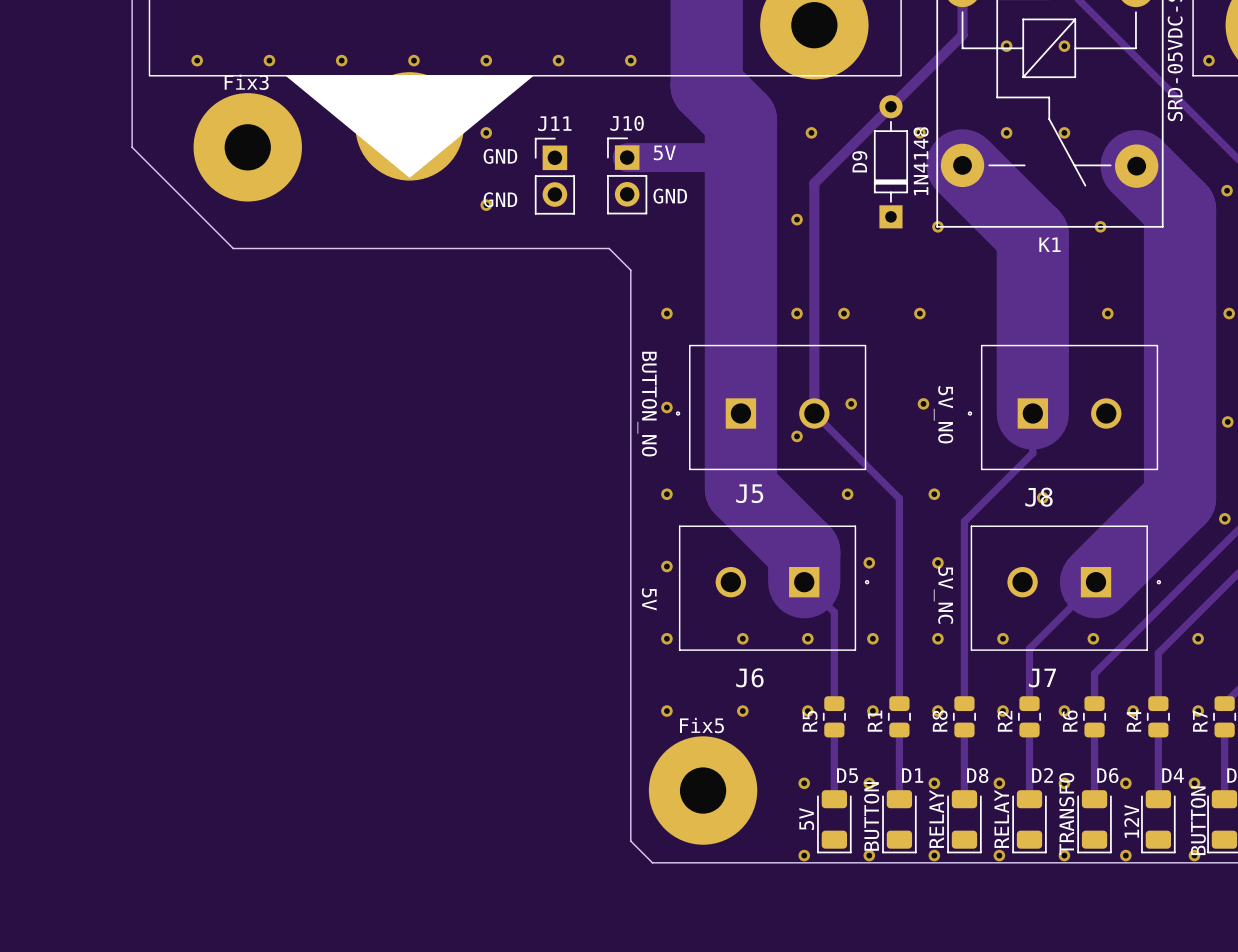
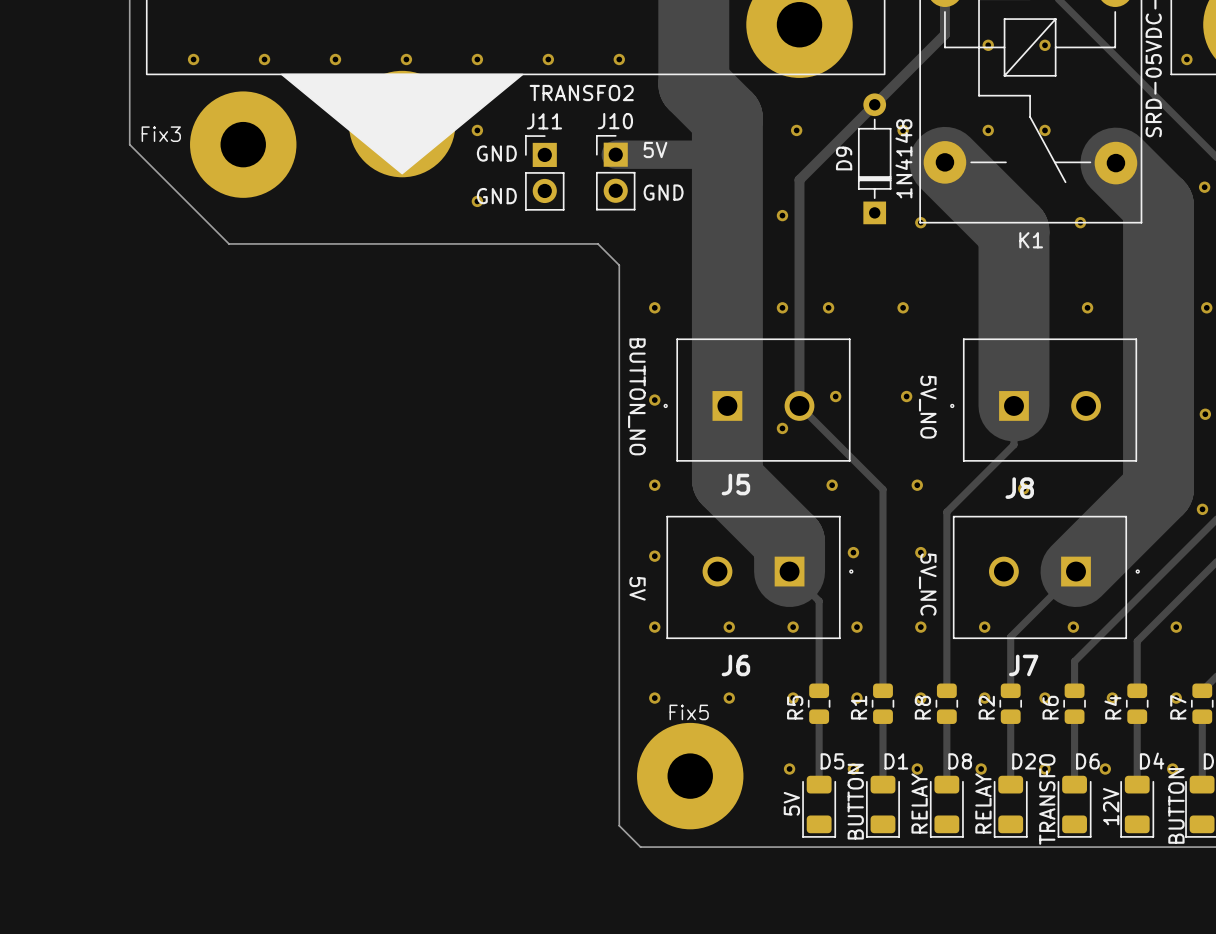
Fix3 name position: Fix3 (246, 82) -> Fix3 (161, 134)
TRANSFO2 name: none -> TRANSFO2 (581, 93)
via: (804, 855) -> none
via: (869, 855) -> none
via: (934, 855) -> none
via: (999, 855) -> none
via: (1064, 855) -> none
via: (1125, 855) -> none
via: (1194, 855) -> none

